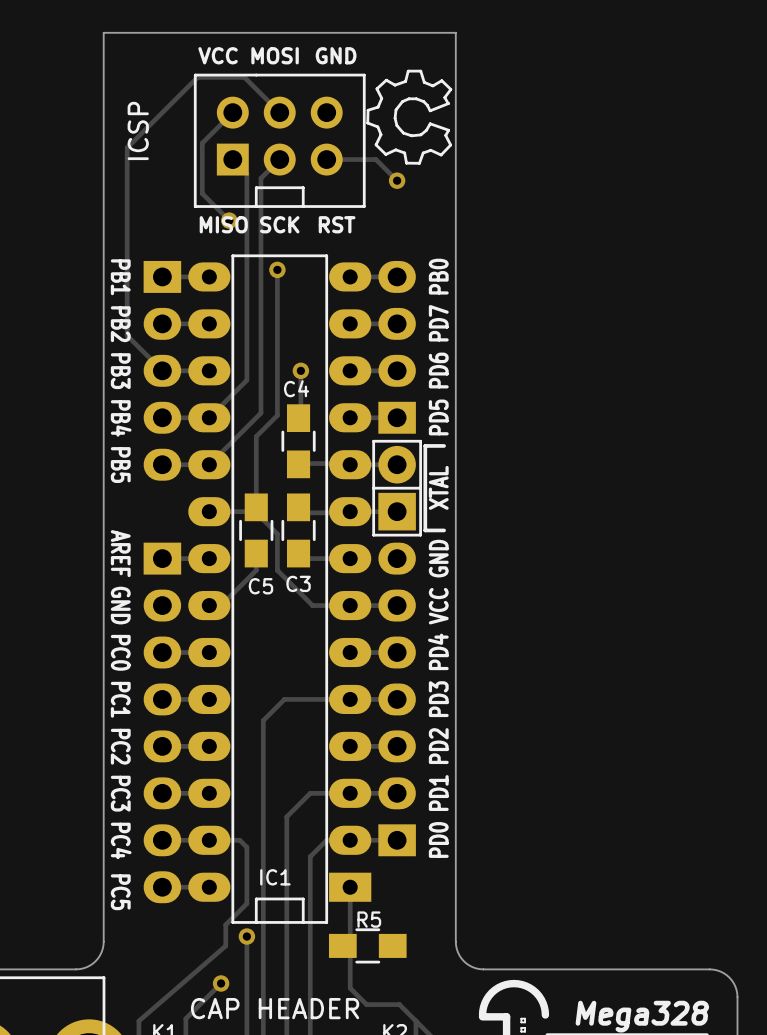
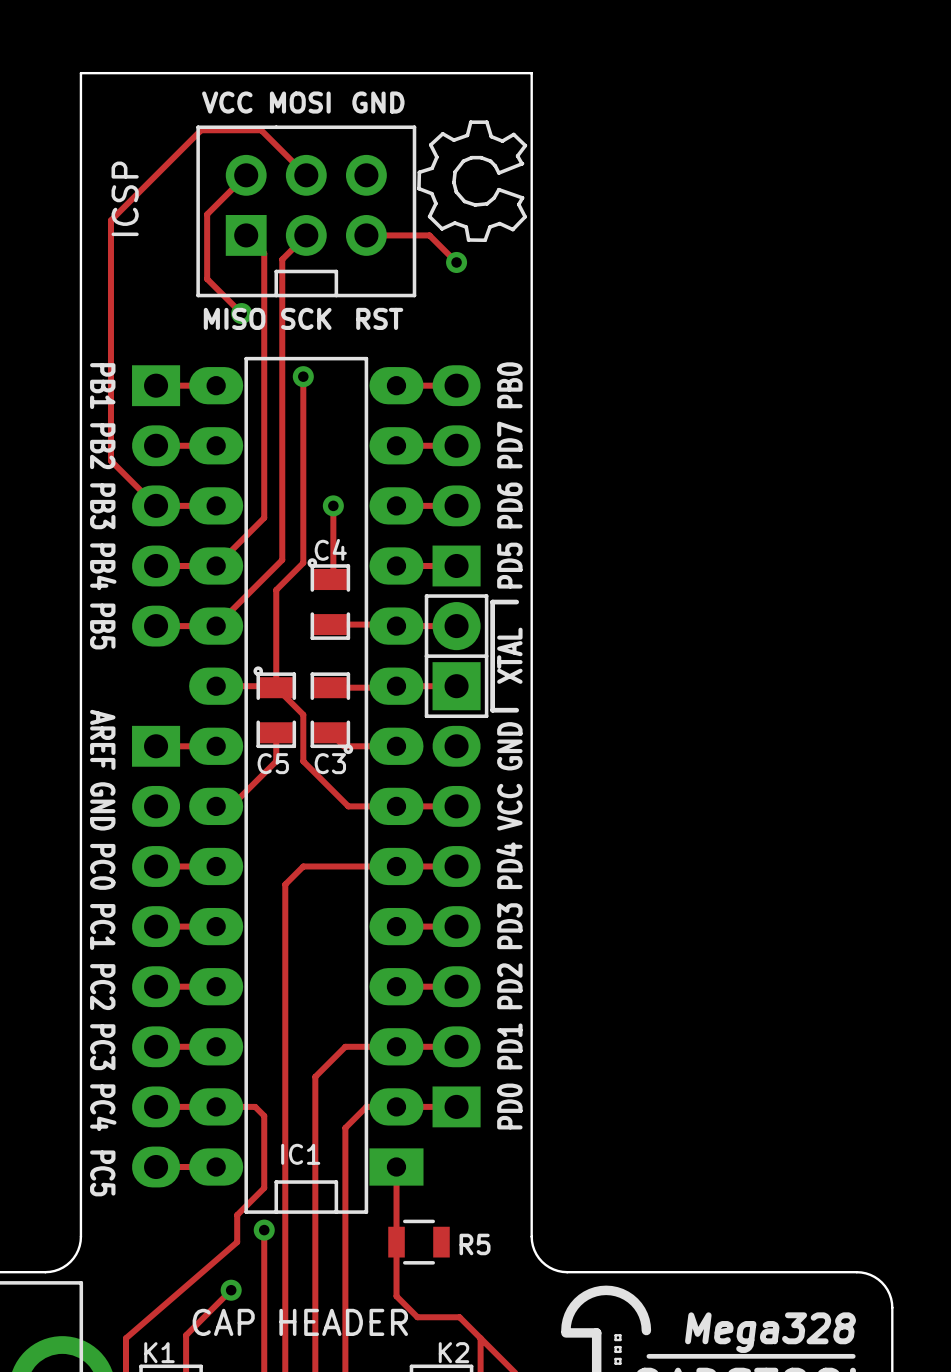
C4 footprint: [281, 404, 316, 479] -> [307, 558, 351, 640]
C5 footprint: [239, 493, 274, 568] -> [253, 666, 297, 749]
C3 footprint: [281, 493, 316, 568] -> [310, 672, 354, 755]
track: (350, 699) (284, 699) (263, 720) -> (396, 866) (303, 866) (285, 884) (285, 953)
R5 name position: R5 (369, 919) -> R5 (475, 1244)
R5 footprint: [328, 928, 407, 964] -> [388, 1219, 450, 1265]

